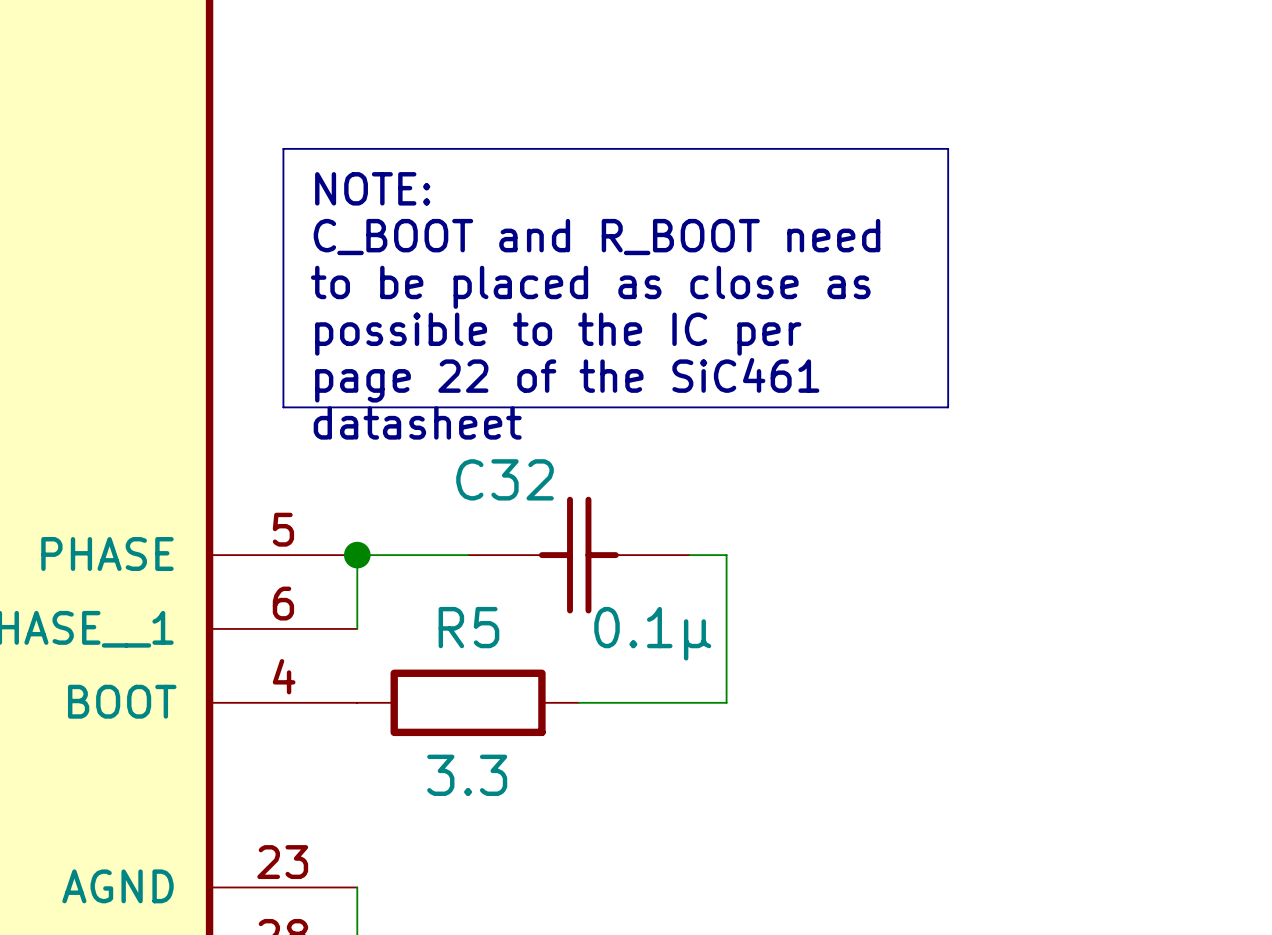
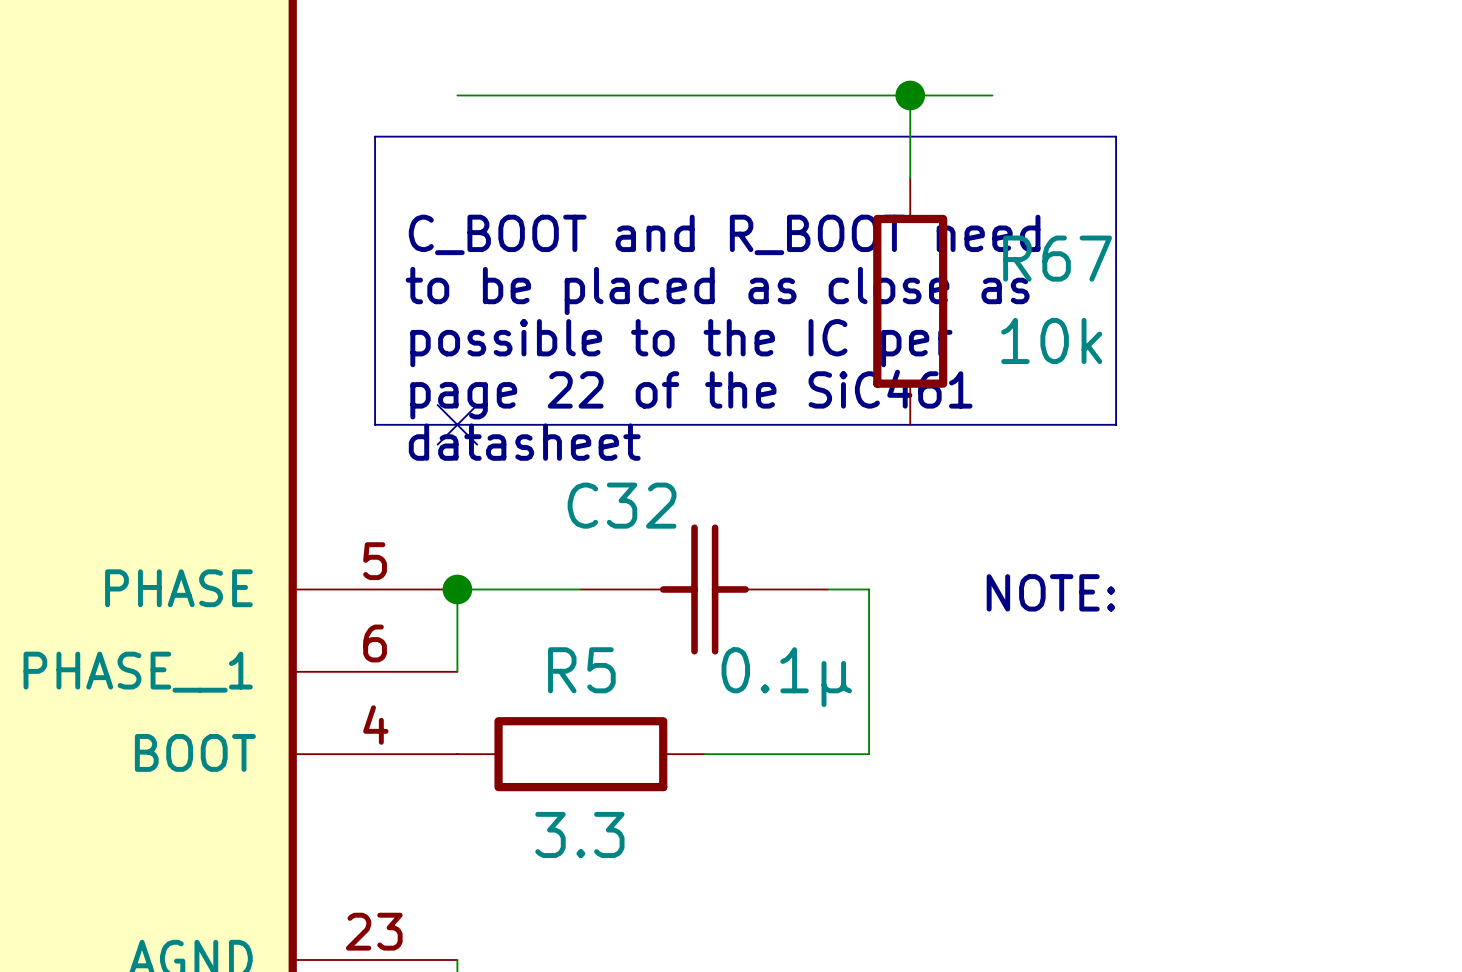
wire: none -> (457, 95) (992, 95)
wire: none -> (910, 95) (910, 177)
junction: none -> (910, 95)
text position: NOTE: (372, 188) -> NOTE: (1050, 592)
R67: none -> 10k (910, 301)
no-connect mark: none -> (457, 424)

